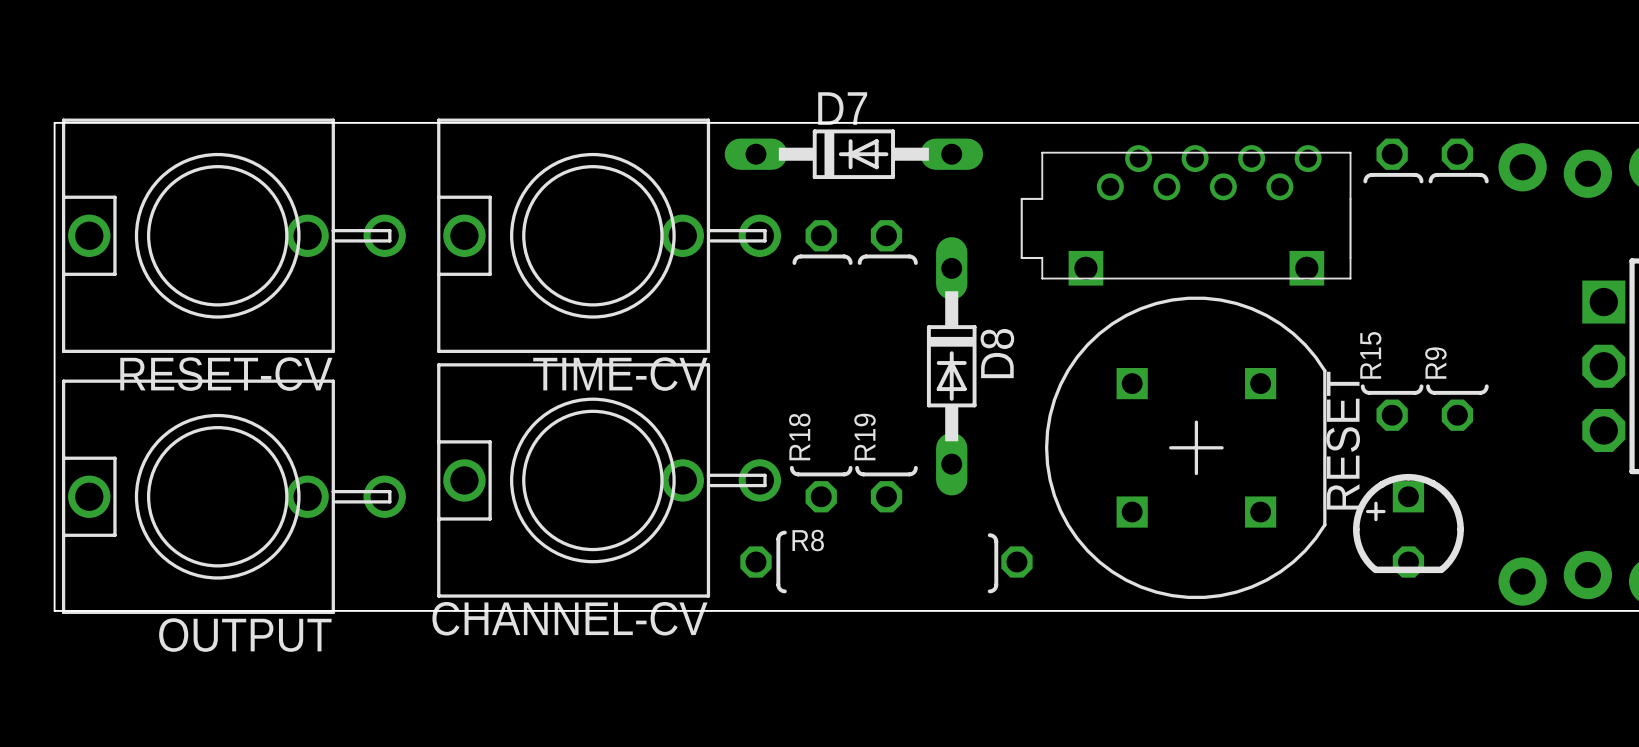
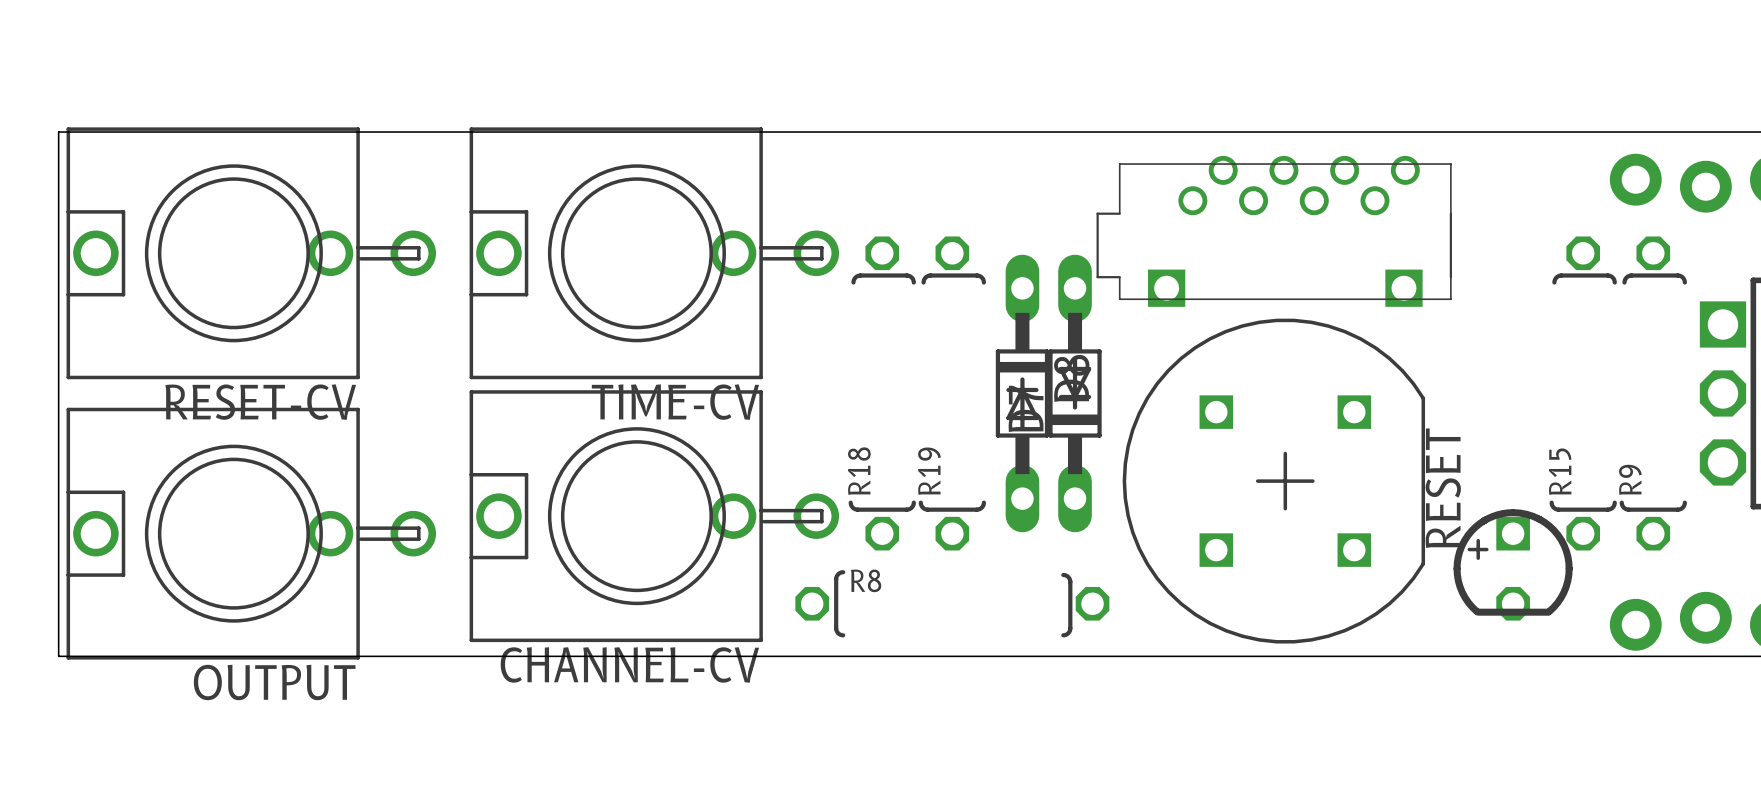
D7 rotation: 0° (853, 154) -> 90° counterclockwise (1075, 393)
D7 position: (853, 154) -> (1075, 393)
R15 position: (1392, 284) -> (1583, 393)
R9 position: (1457, 284) -> (1653, 393)

